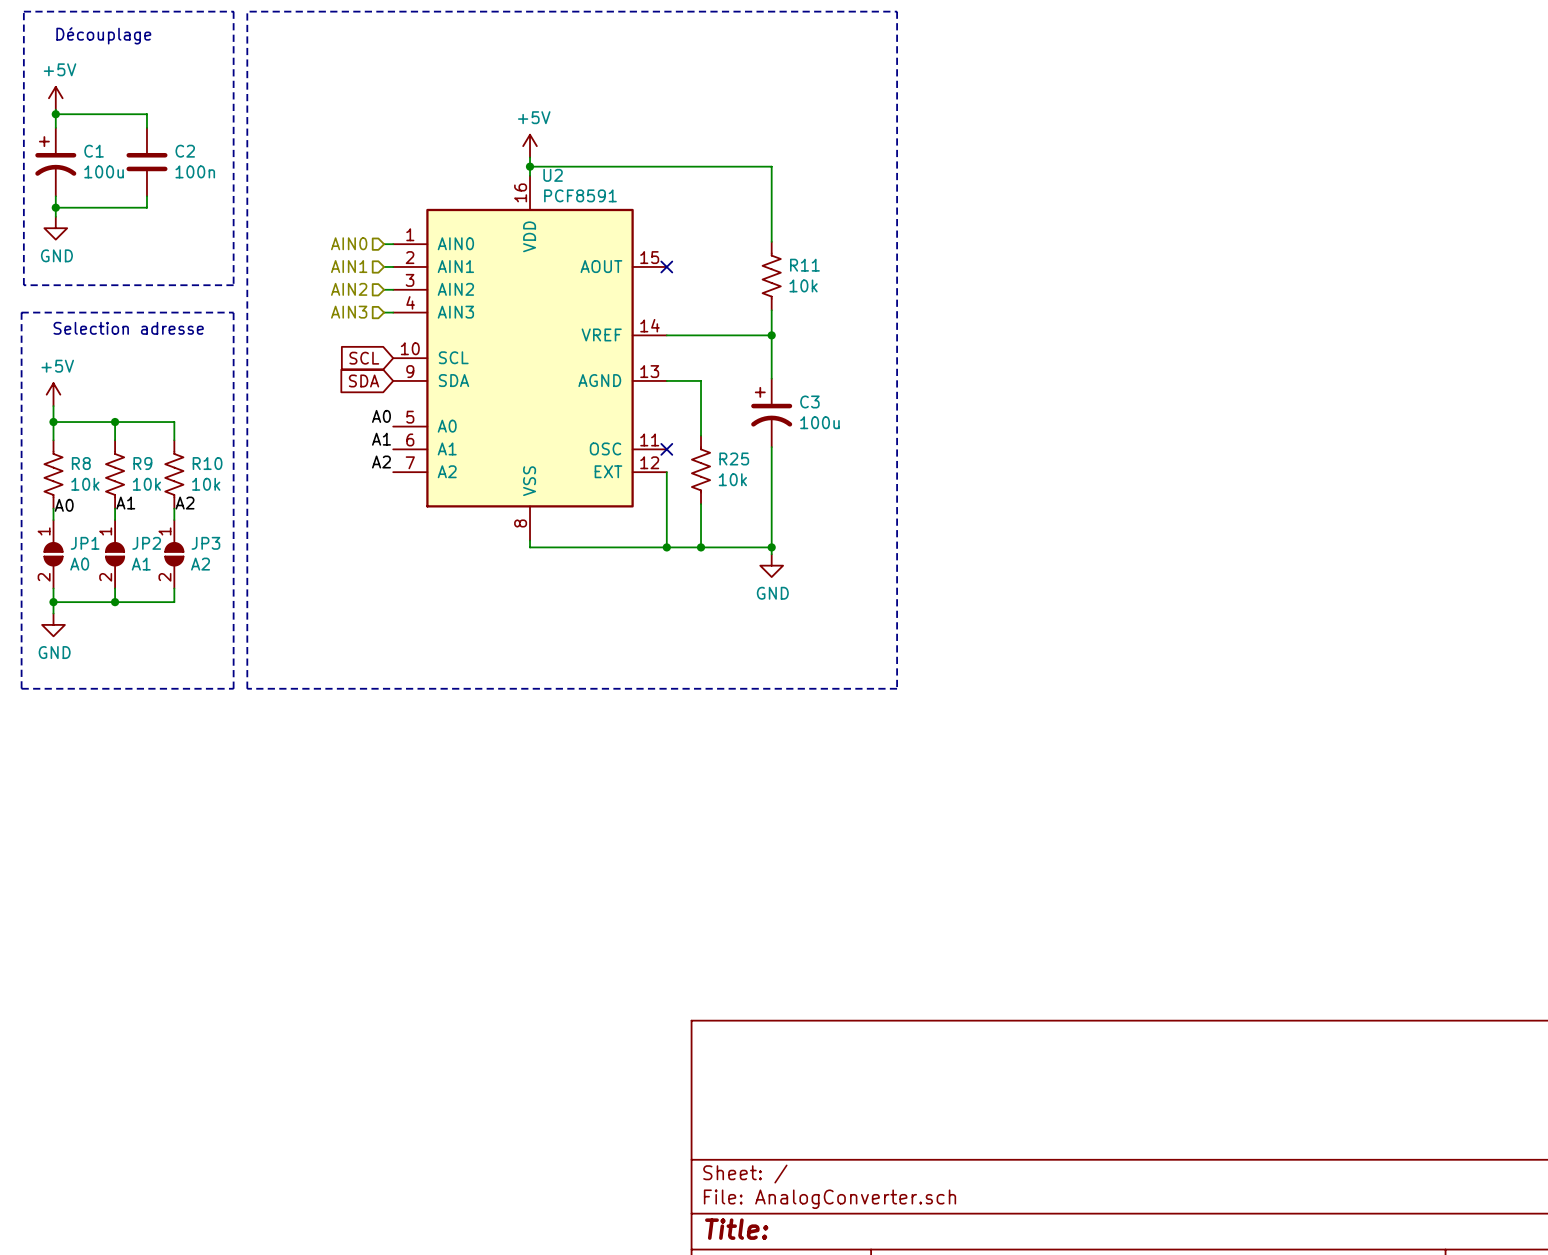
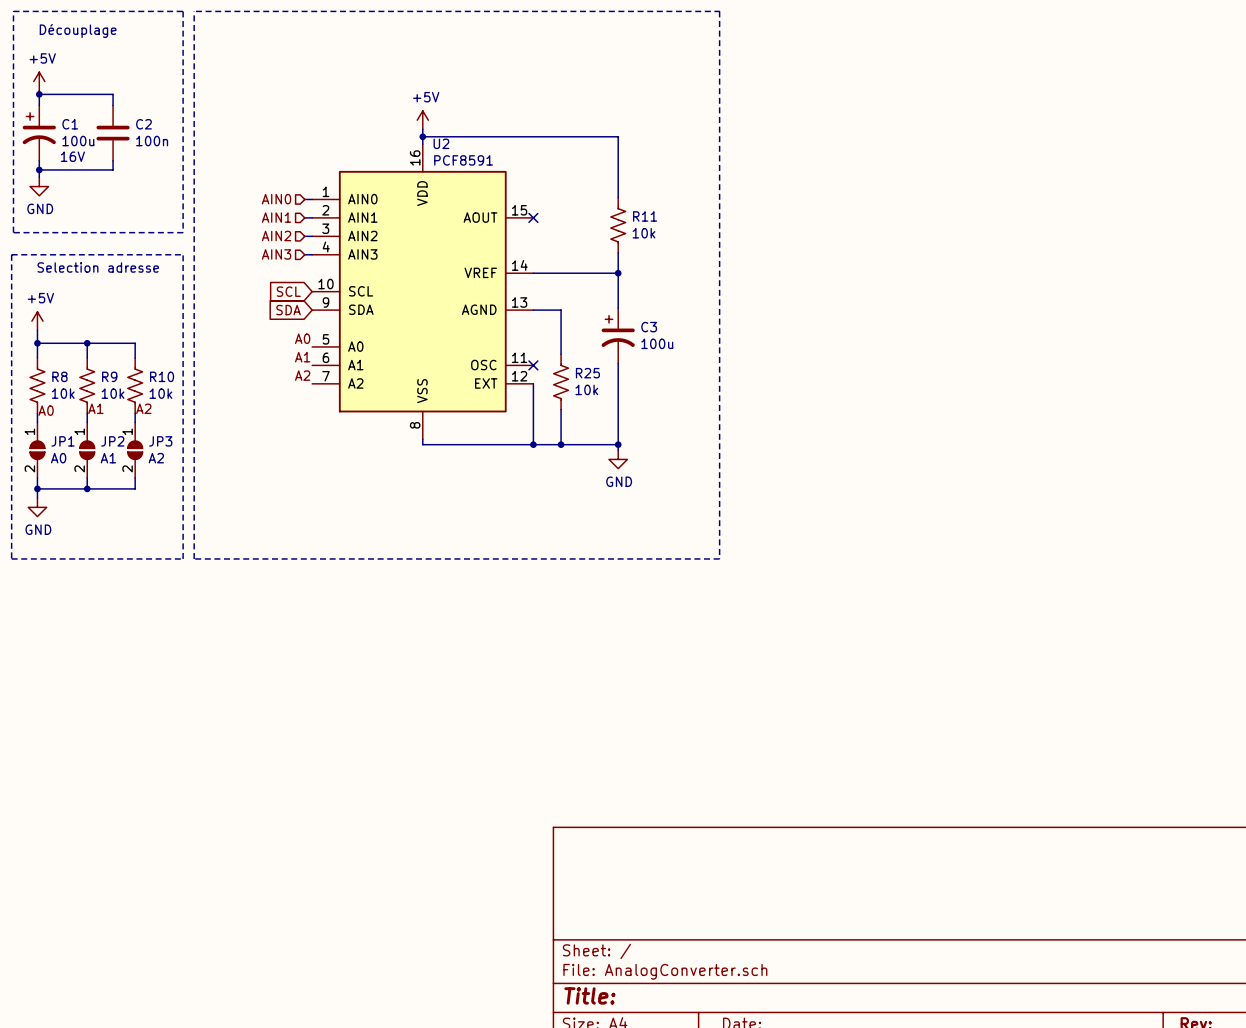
C1 text: none -> 16V (72, 156)

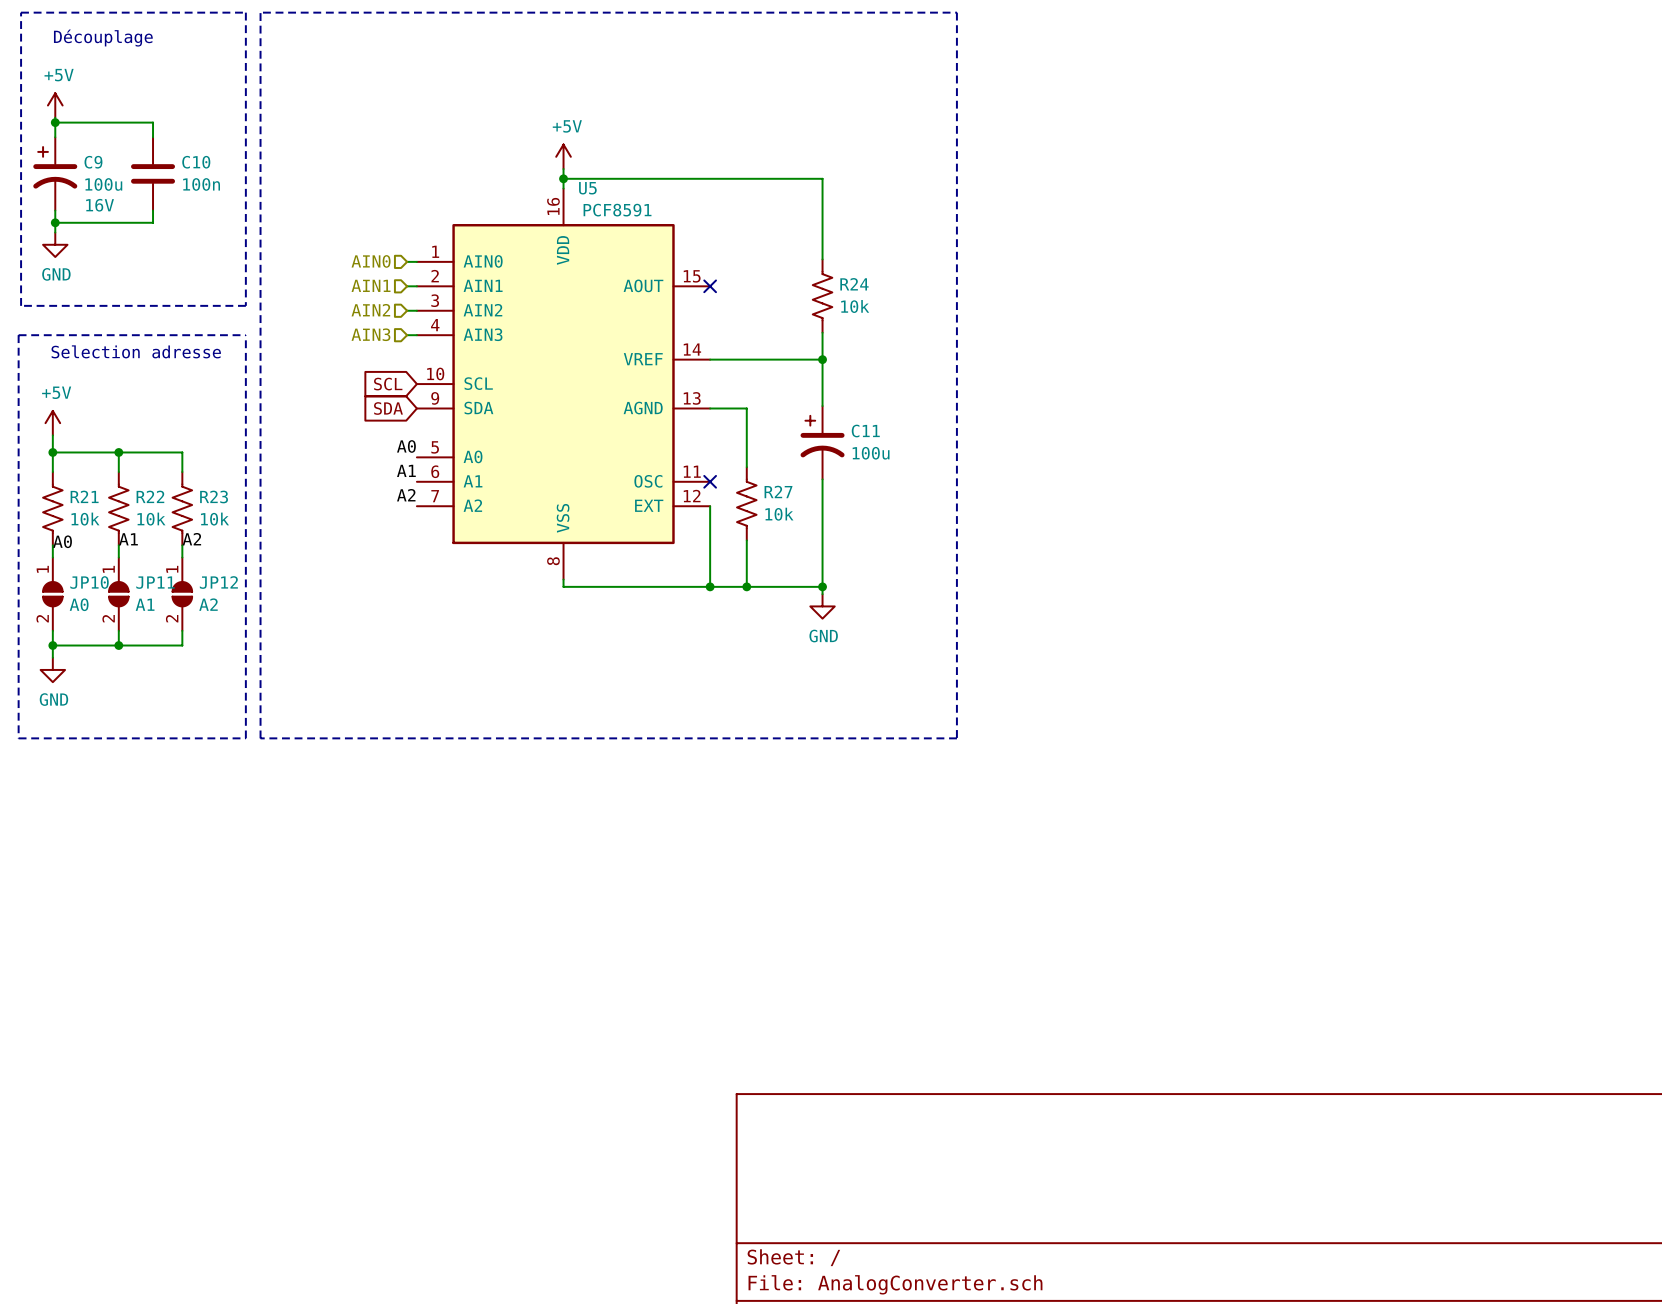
C1 name: C1 (70, 124) -> C9 (93, 162)
C2 name: C2 (143, 124) -> C10 (196, 162)
U2 name: U2 (441, 143) -> U5 (587, 188)
R11 name: R11 (645, 216) -> R24 (854, 284)
C3 name: C3 (649, 327) -> C11 (865, 431)
R25 name: R25 (587, 373) -> R27 (778, 491)
R8 name: R8 (59, 376) -> R21 (84, 496)
R9 name: R9 (109, 376) -> R22 (150, 496)
R10 name: R10 (162, 376) -> R23 (214, 496)
JP1 name: JP1 (63, 441) -> JP10 (89, 582)
JP2 name: JP2 (112, 441) -> JP11 (155, 582)
JP3 name: JP3 (160, 441) -> JP12 (218, 582)

